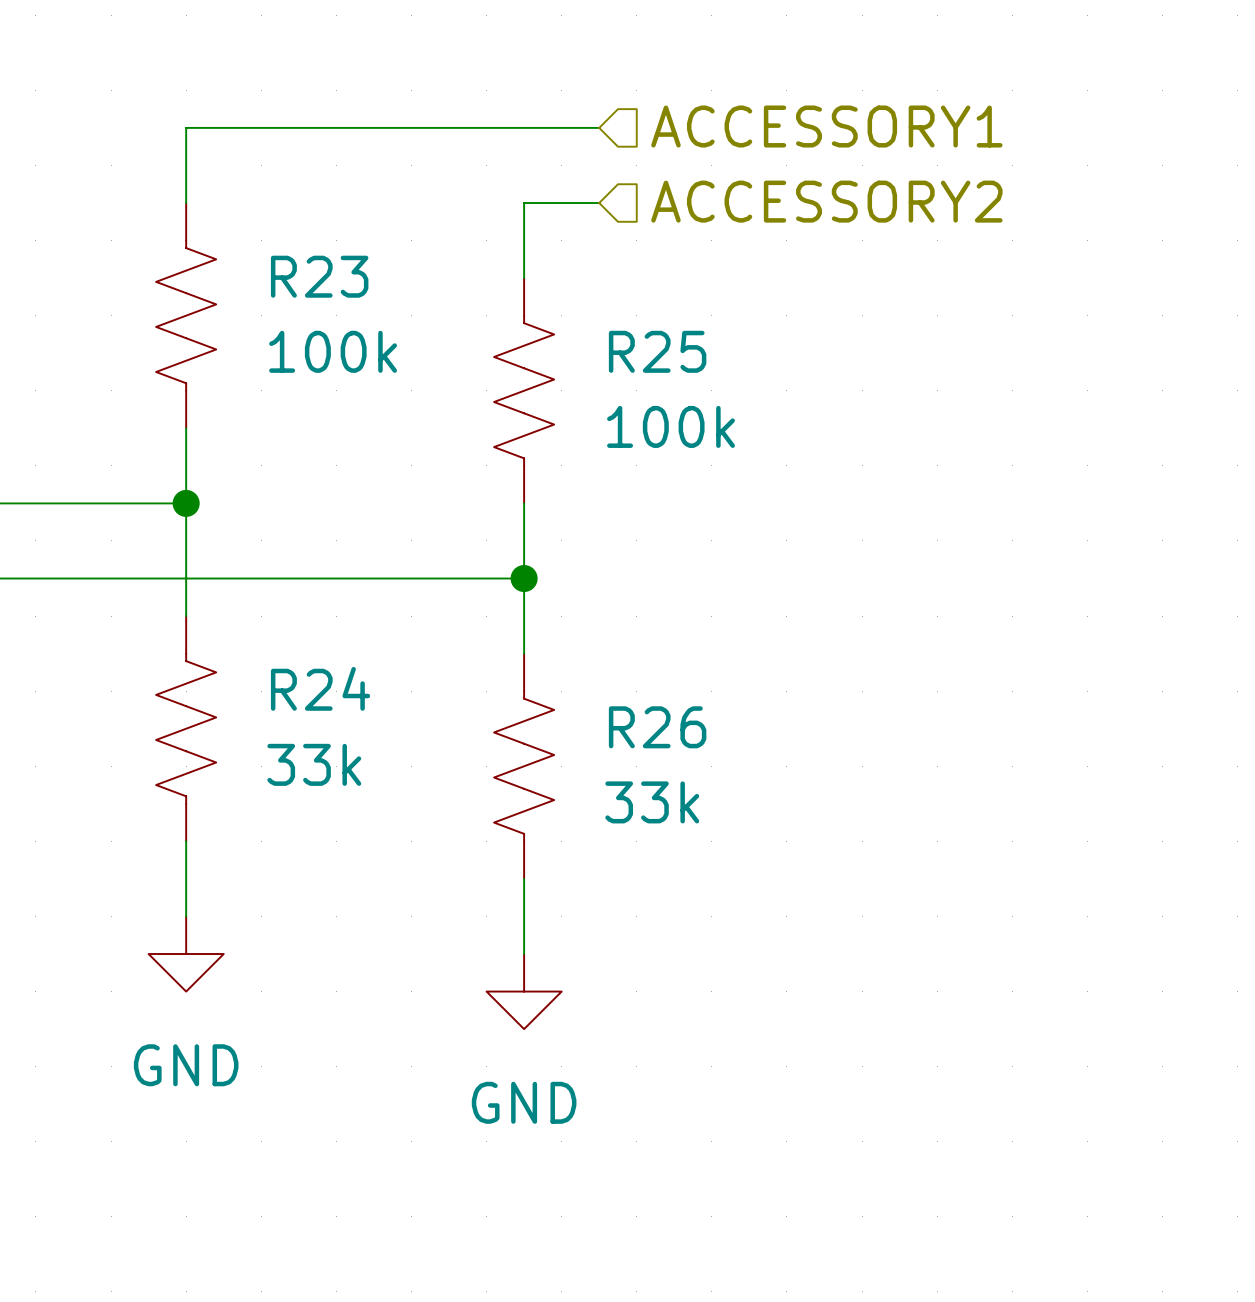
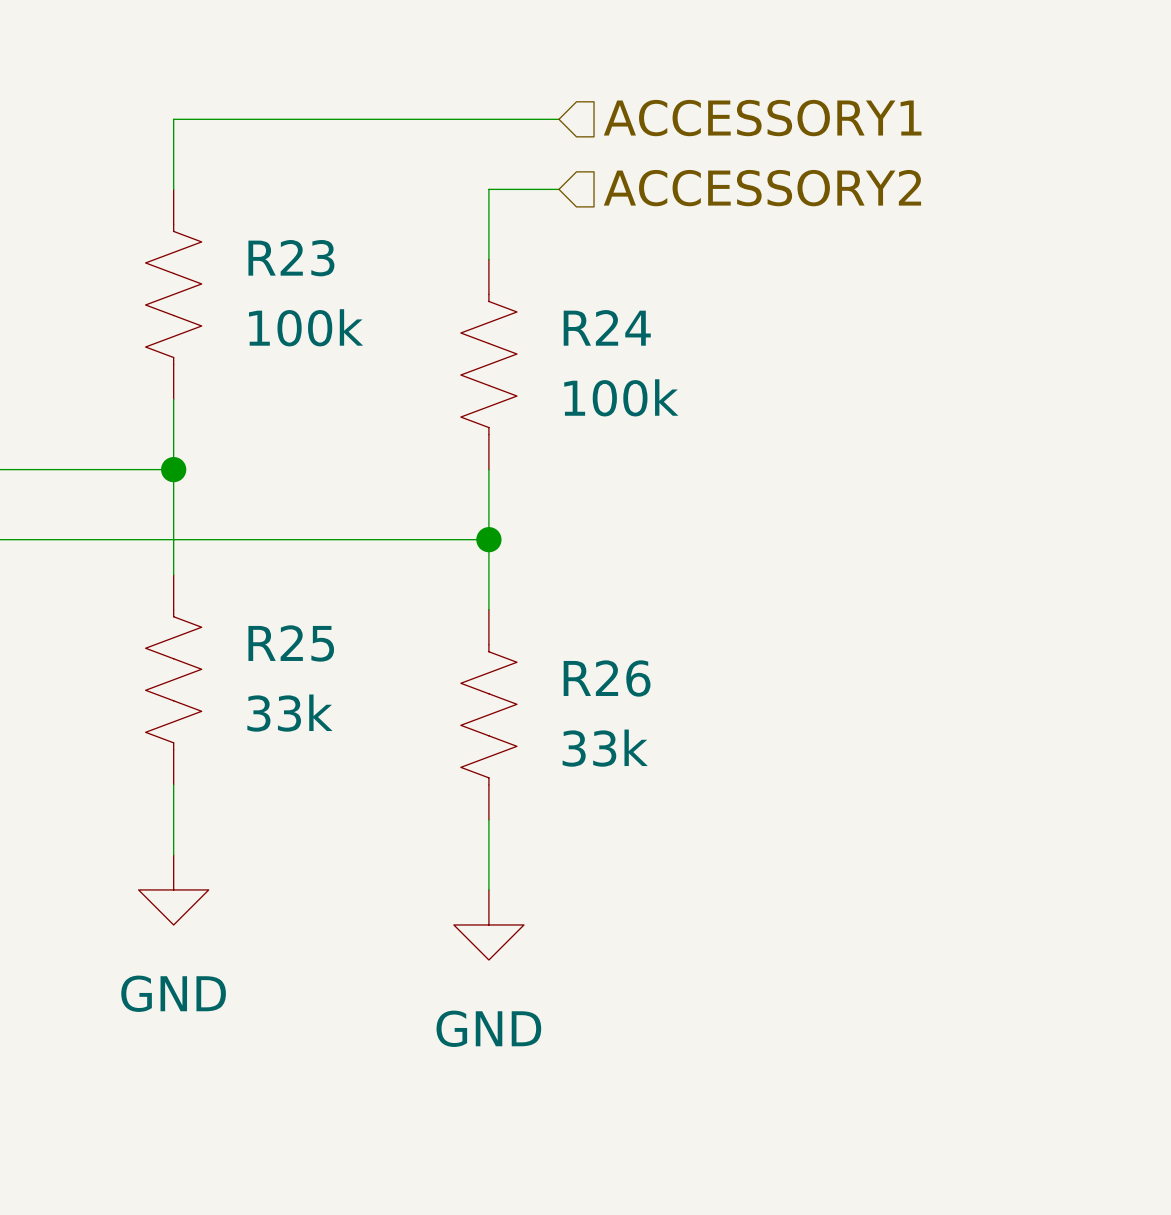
R25 name: R25 (657, 351) -> R24 (607, 327)
R24 name: R24 (320, 688) -> R25 (291, 643)

